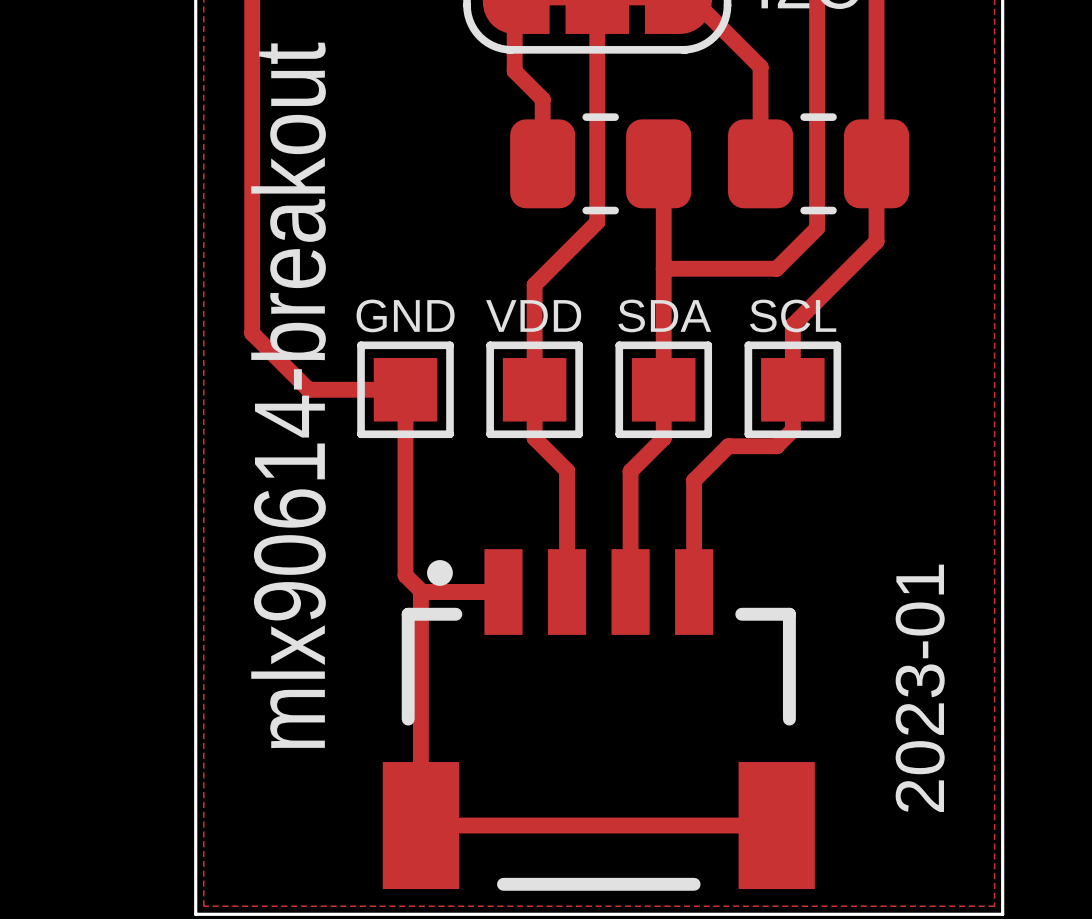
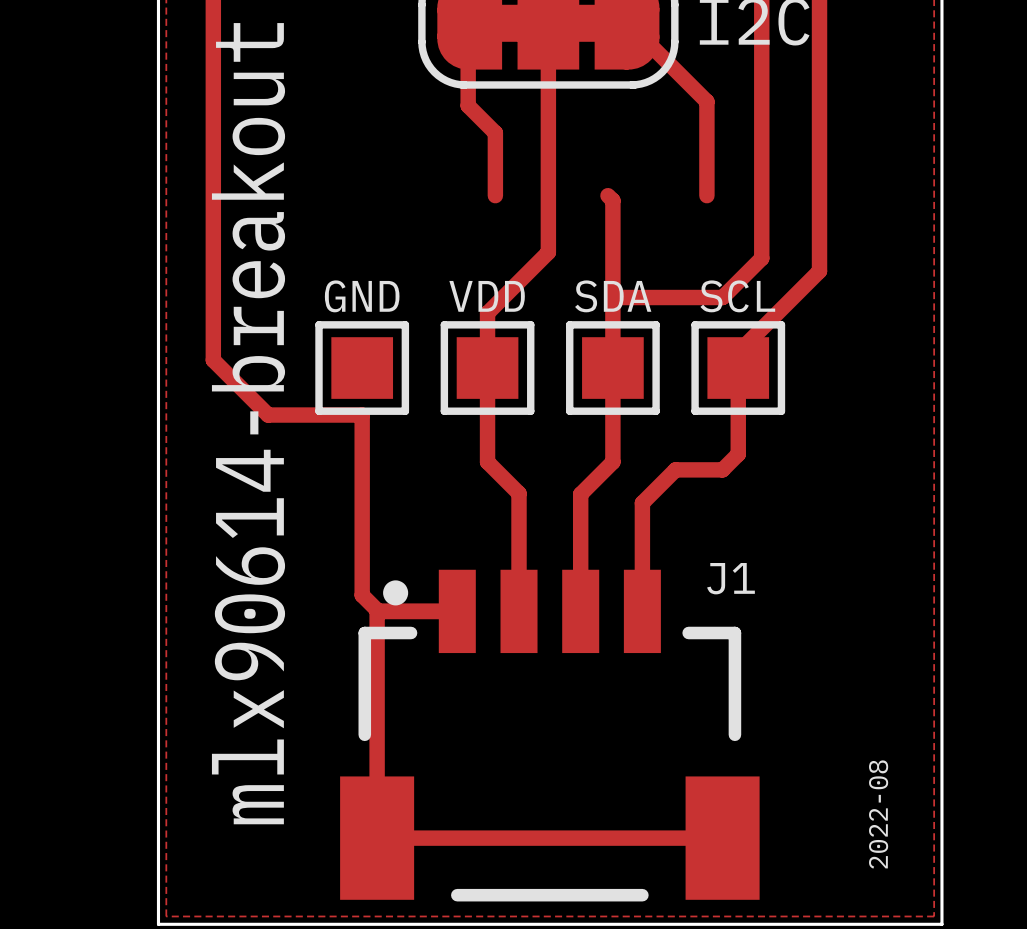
part: (600, 163) -> none
part: (818, 163) -> none
GND position: (405, 389) -> (362, 368)
VDD position: (534, 389) -> (487, 368)
SDA position: (663, 389) -> (612, 368)
SCL position: (792, 389) -> (738, 368)
J1 name: none -> J1 (731, 578)
text: 2023-01 (920, 688) -> 2022-08 (878, 814)

